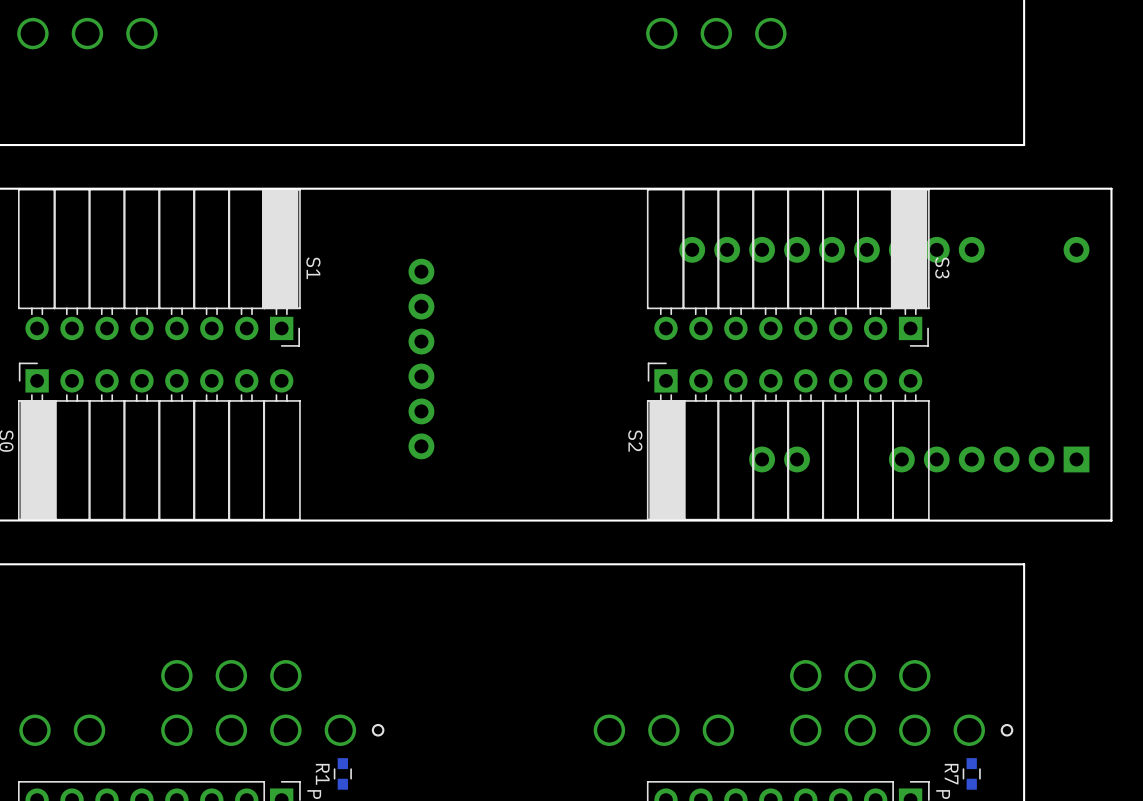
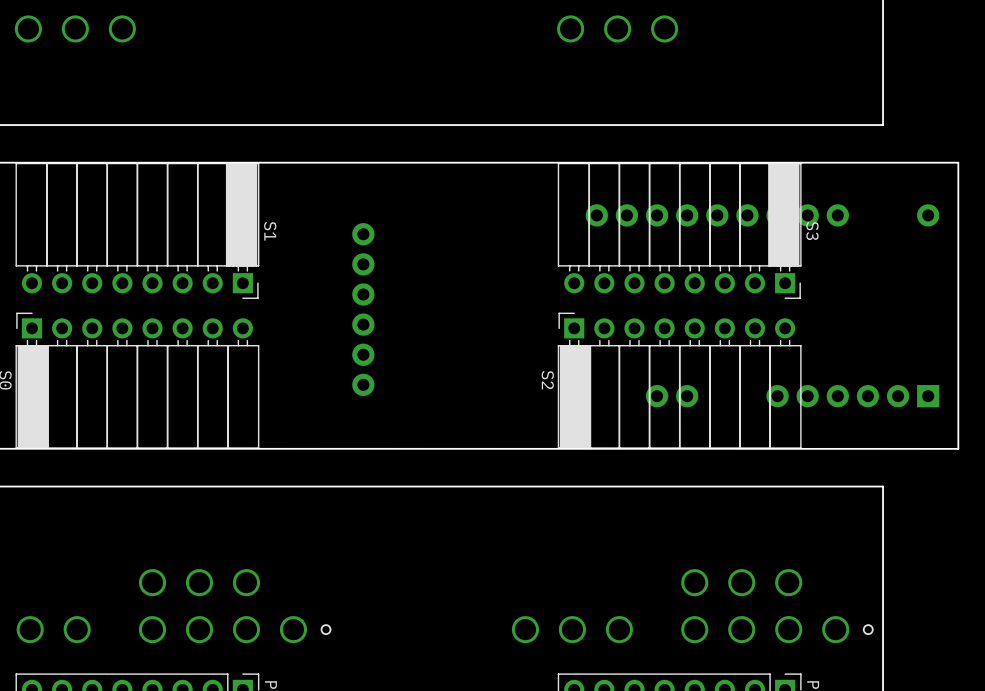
R1: (342, 773) -> none
R7: (971, 773) -> none

